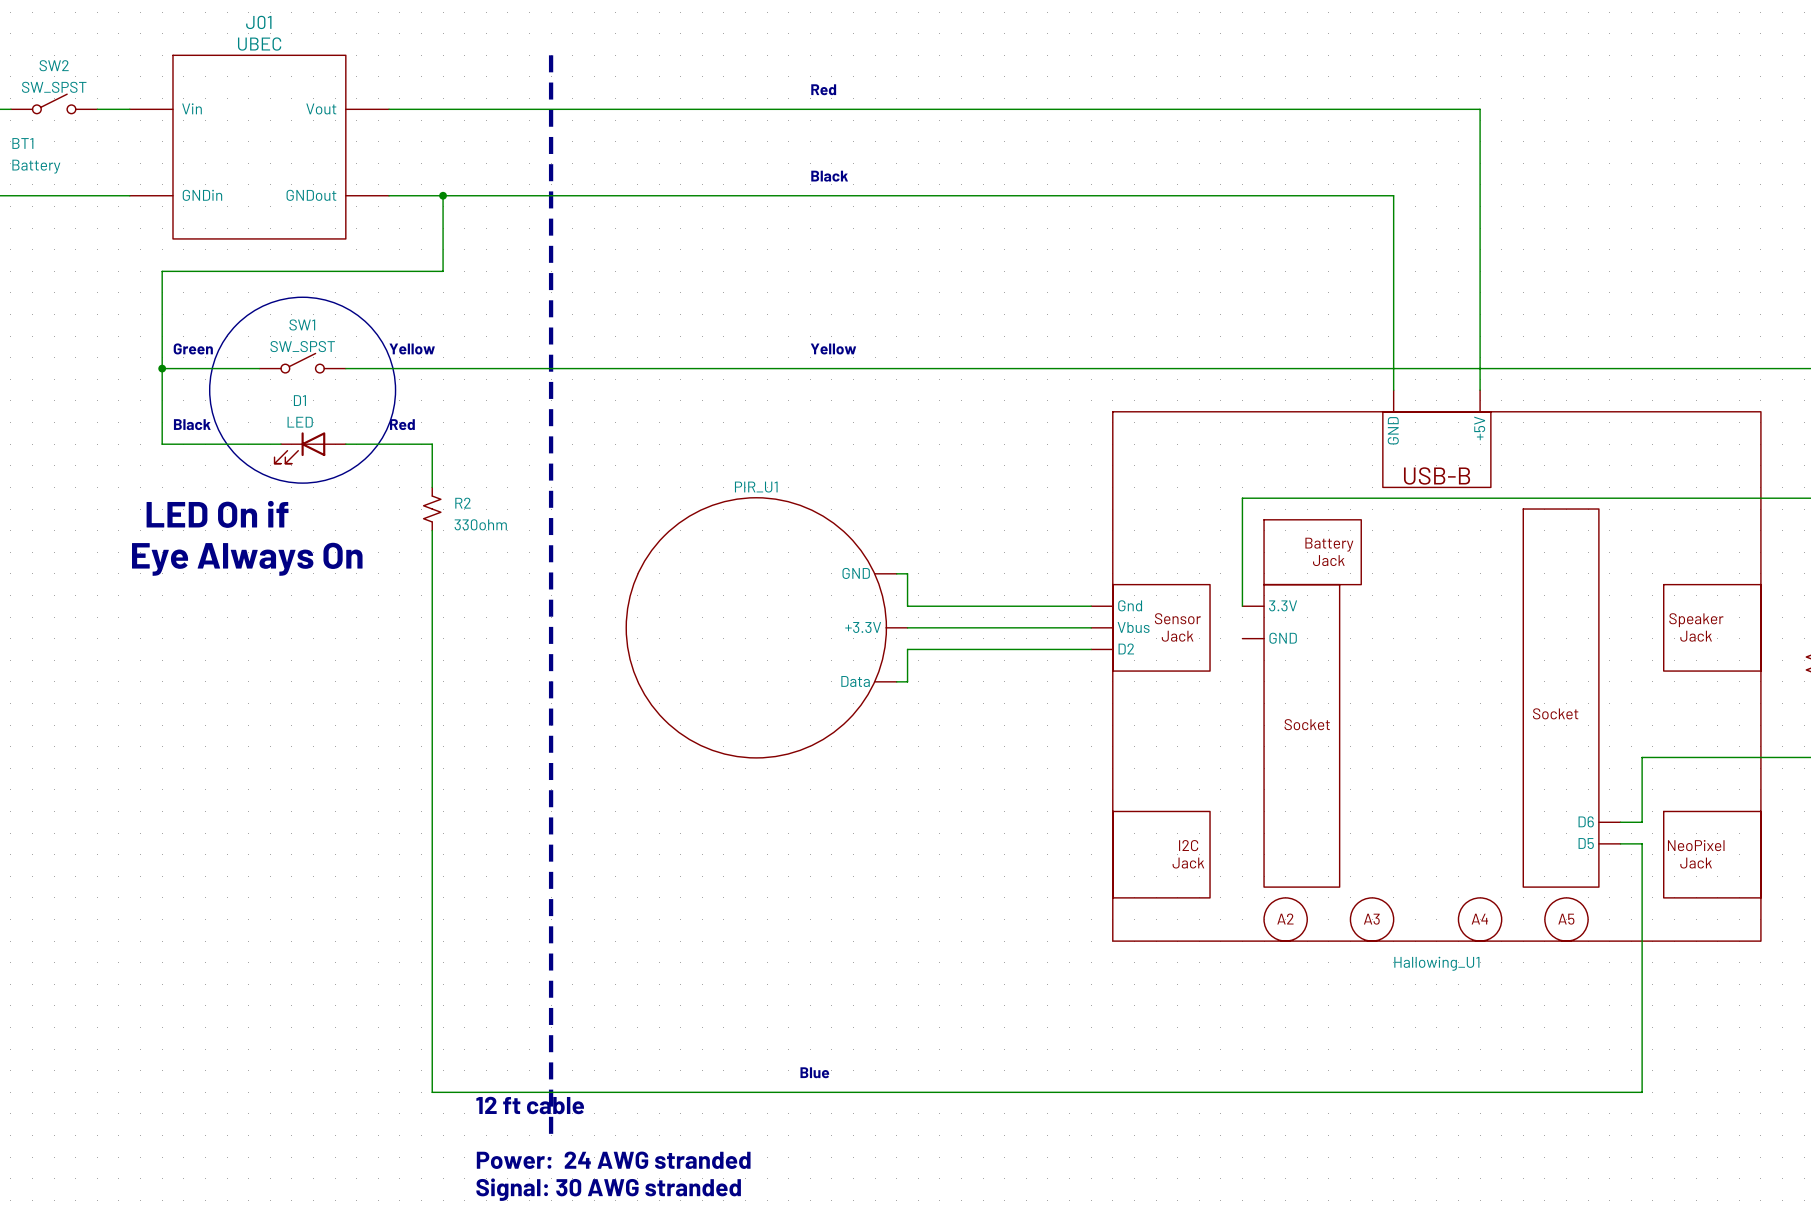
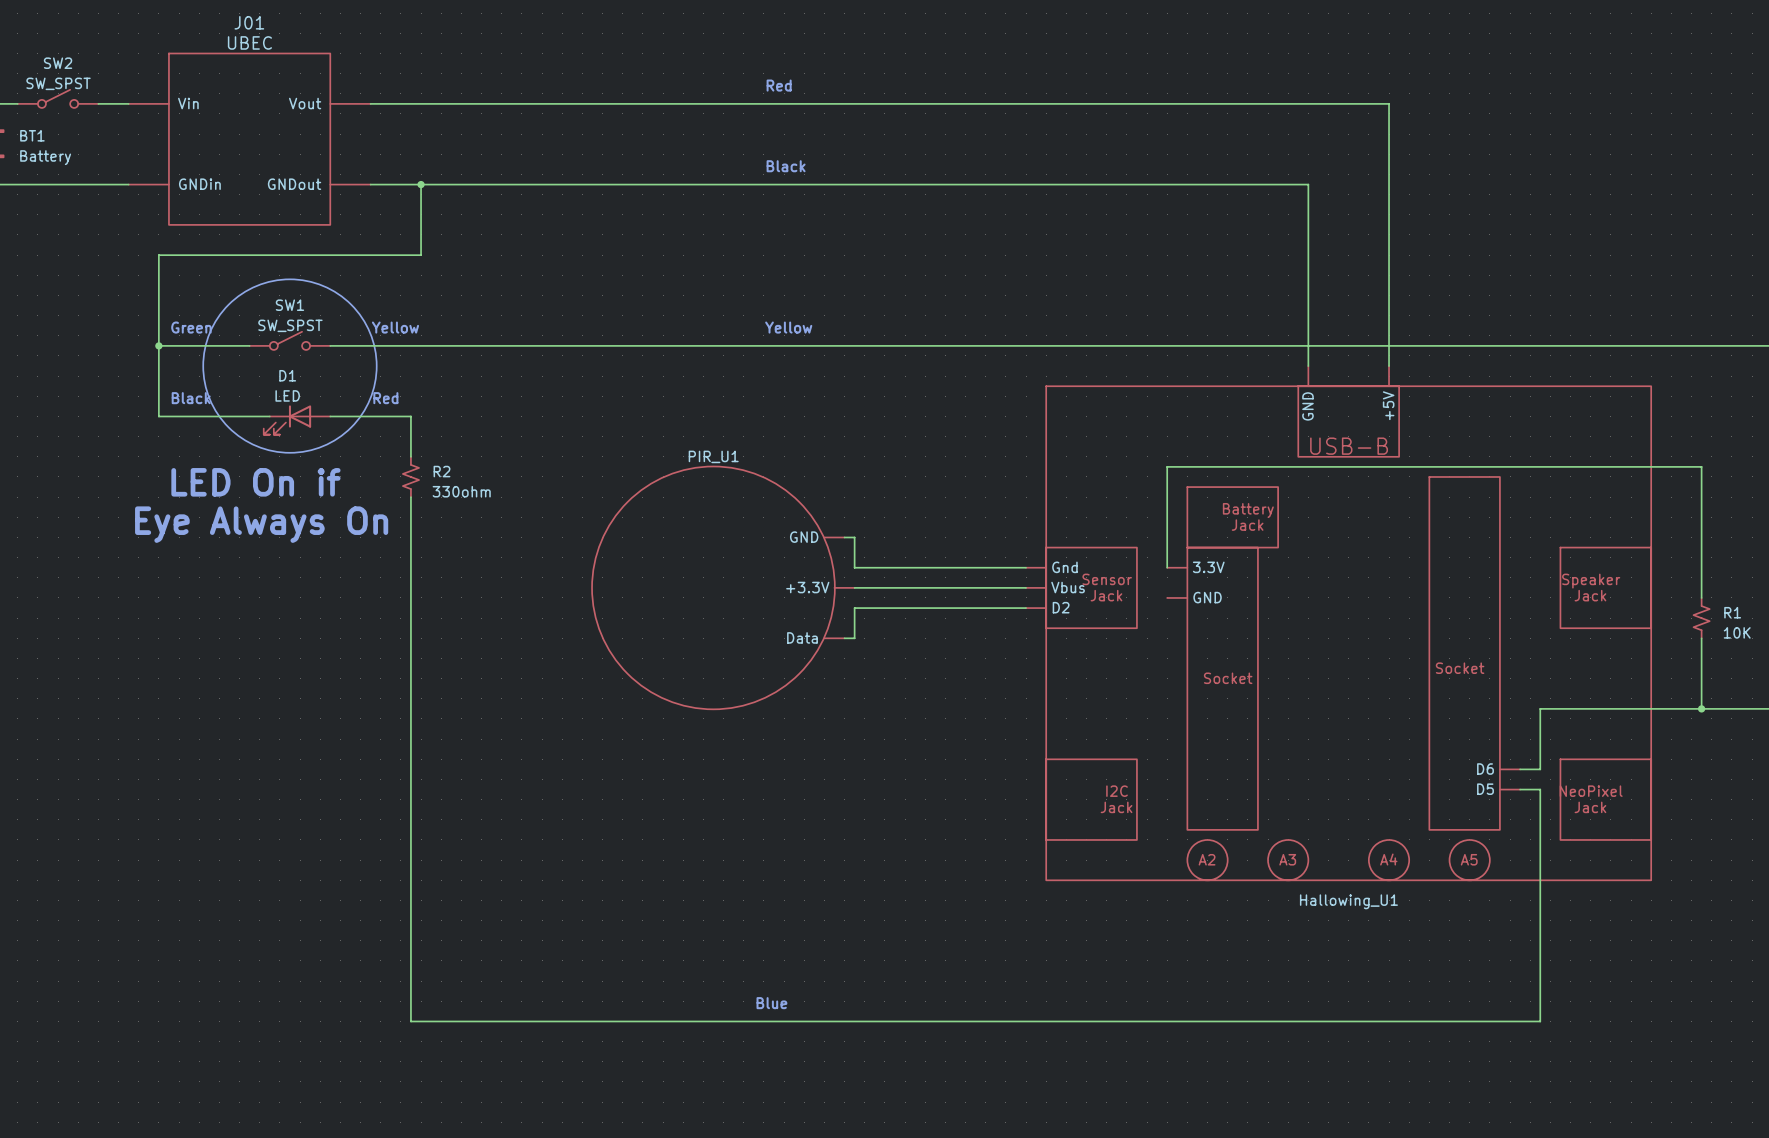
line: (551, 55) (551, 1135) -> none
text: 12 ft cable (530, 1105) -> none
text: Power: 24 AWG stranded (613, 1160) -> none
text: Signal: 30 AWG stranded (608, 1189) -> none

